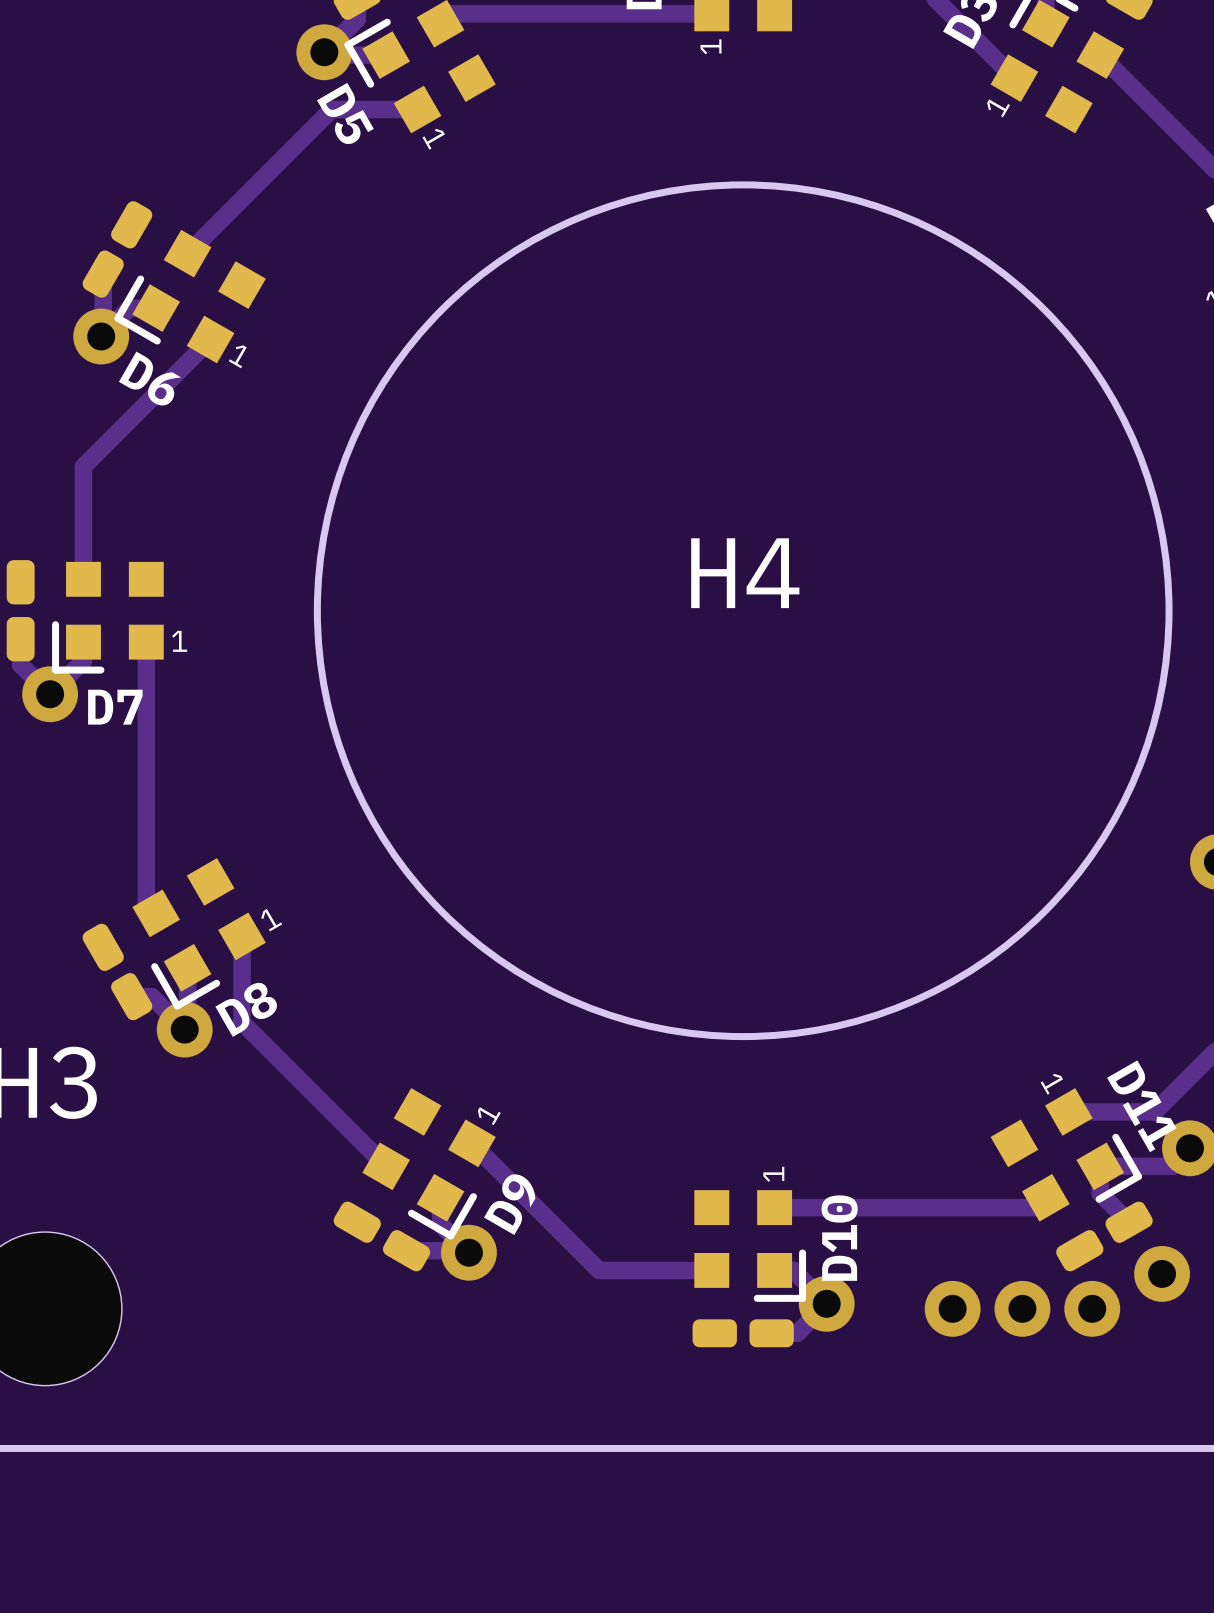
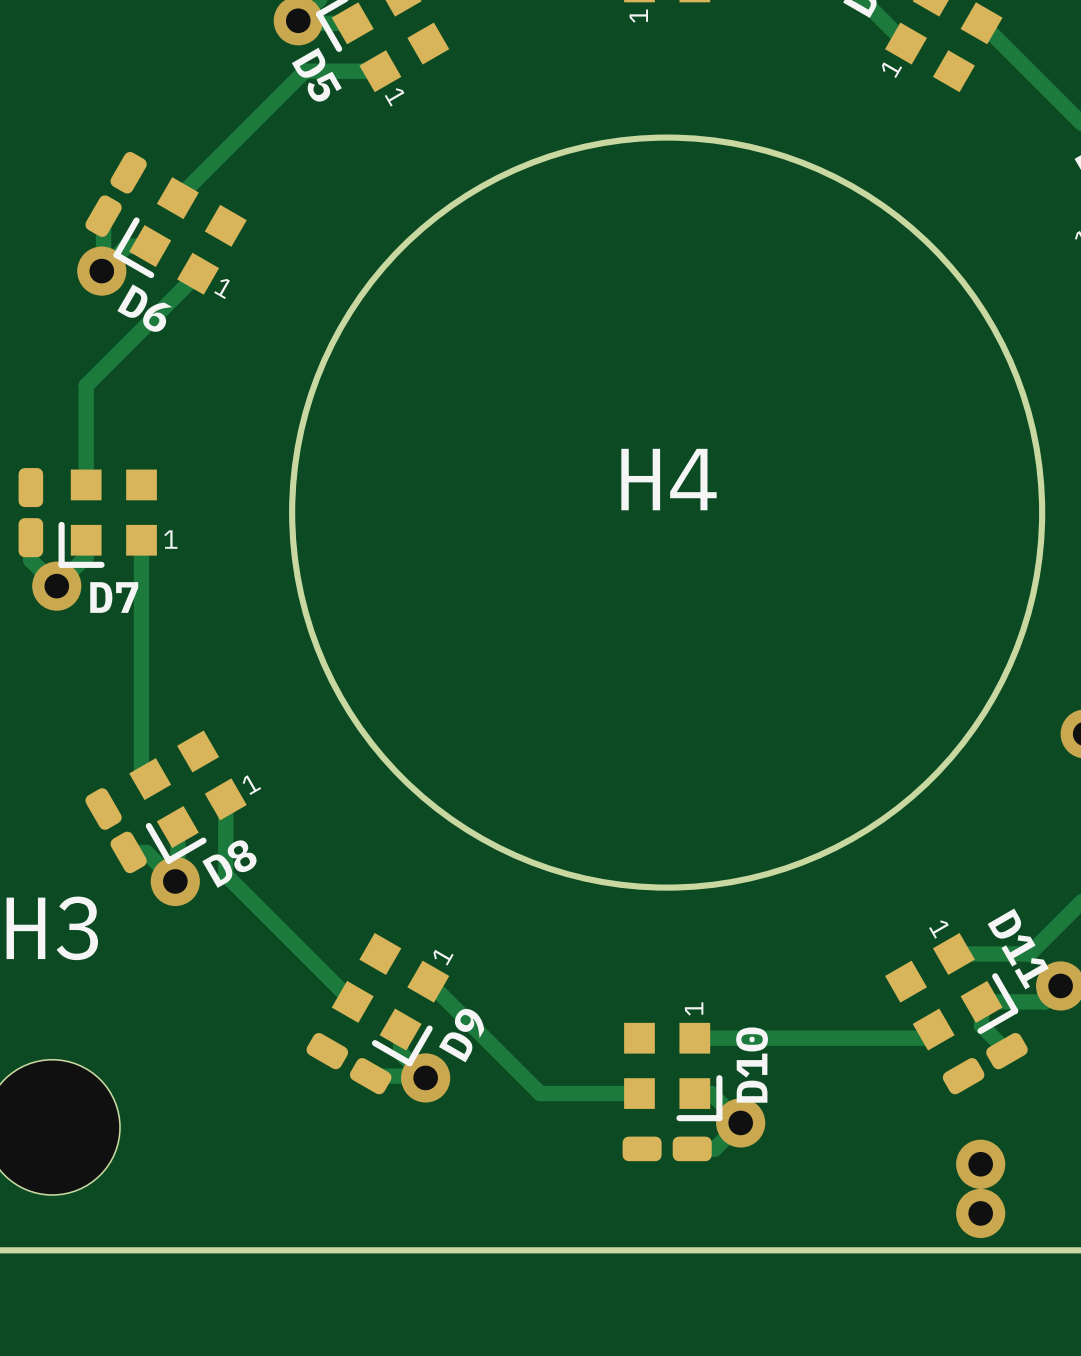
via: (1162, 1273) -> none
via: (952, 1308) -> none
via: (1022, 1308) -> none
via position: (1092, 1308) -> (980, 1164)
via: none -> (980, 1213)

